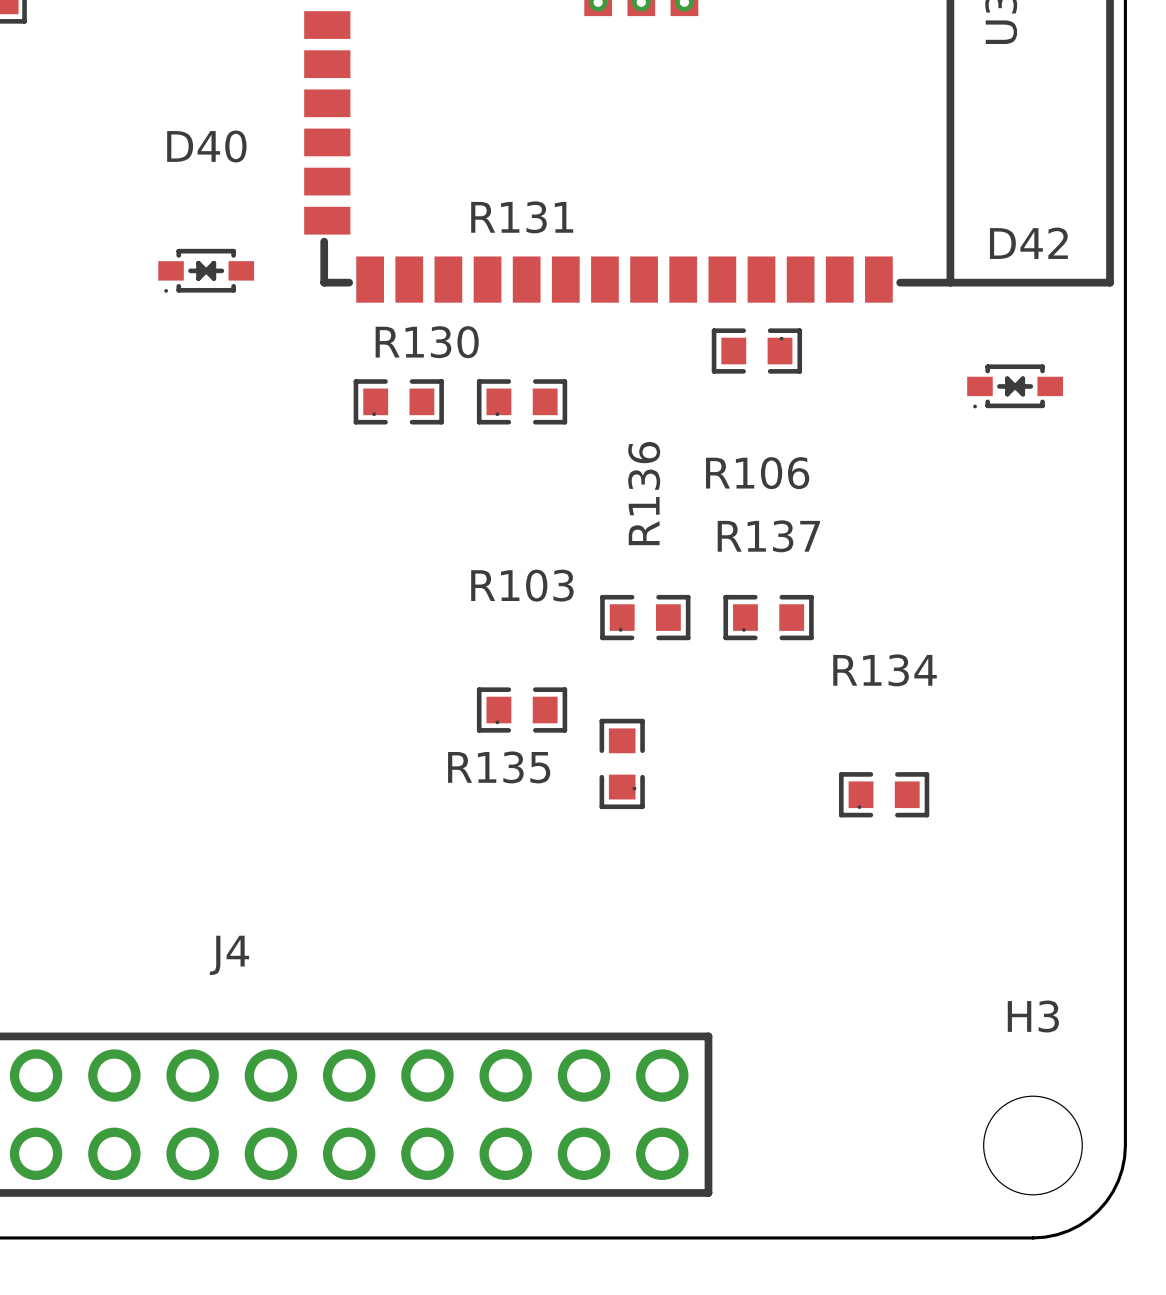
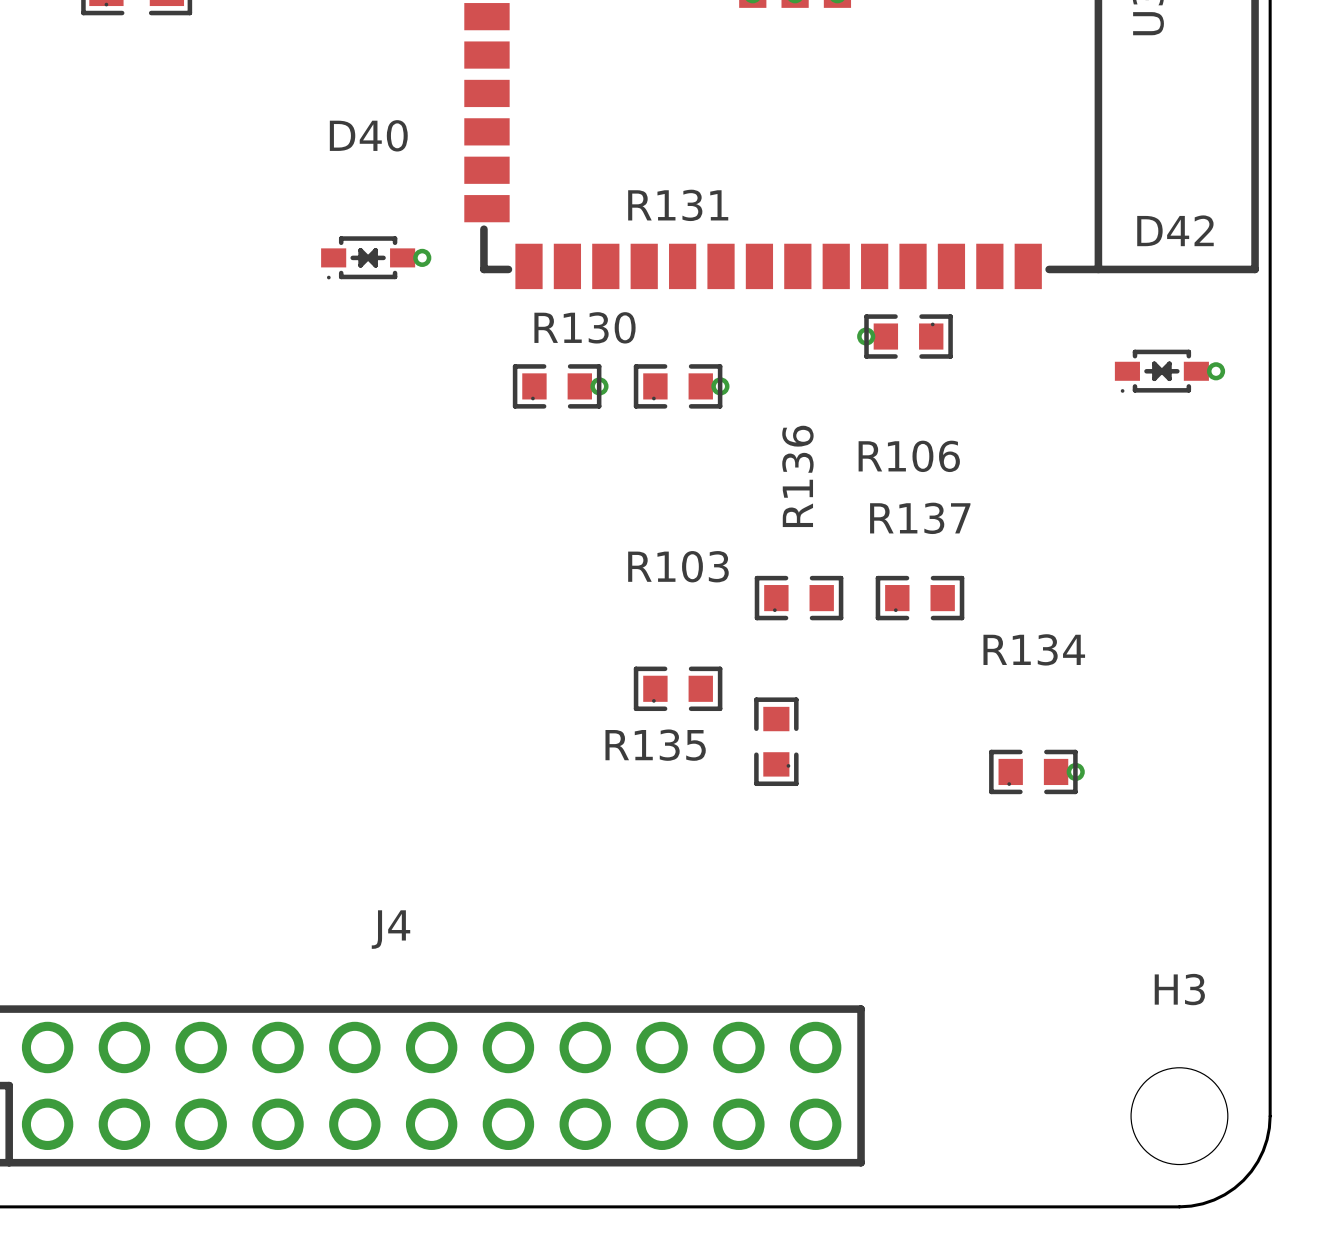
via: none -> (422, 257)
via: none -> (866, 336)
via: none -> (1216, 371)
via: none -> (599, 386)
via: none -> (720, 386)
via: none -> (1075, 771)

